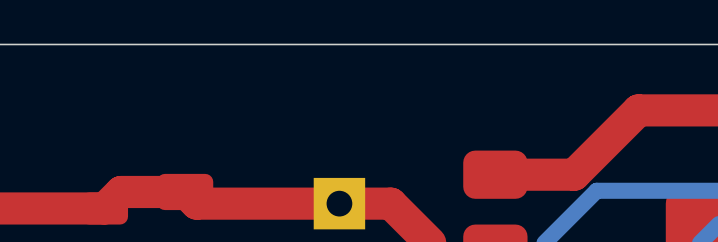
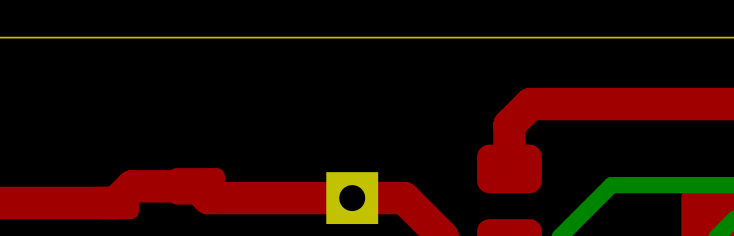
top track: (638, 110) (574, 174) (495, 174) -> (653, 104) (530, 104) (509, 125) (509, 168)

